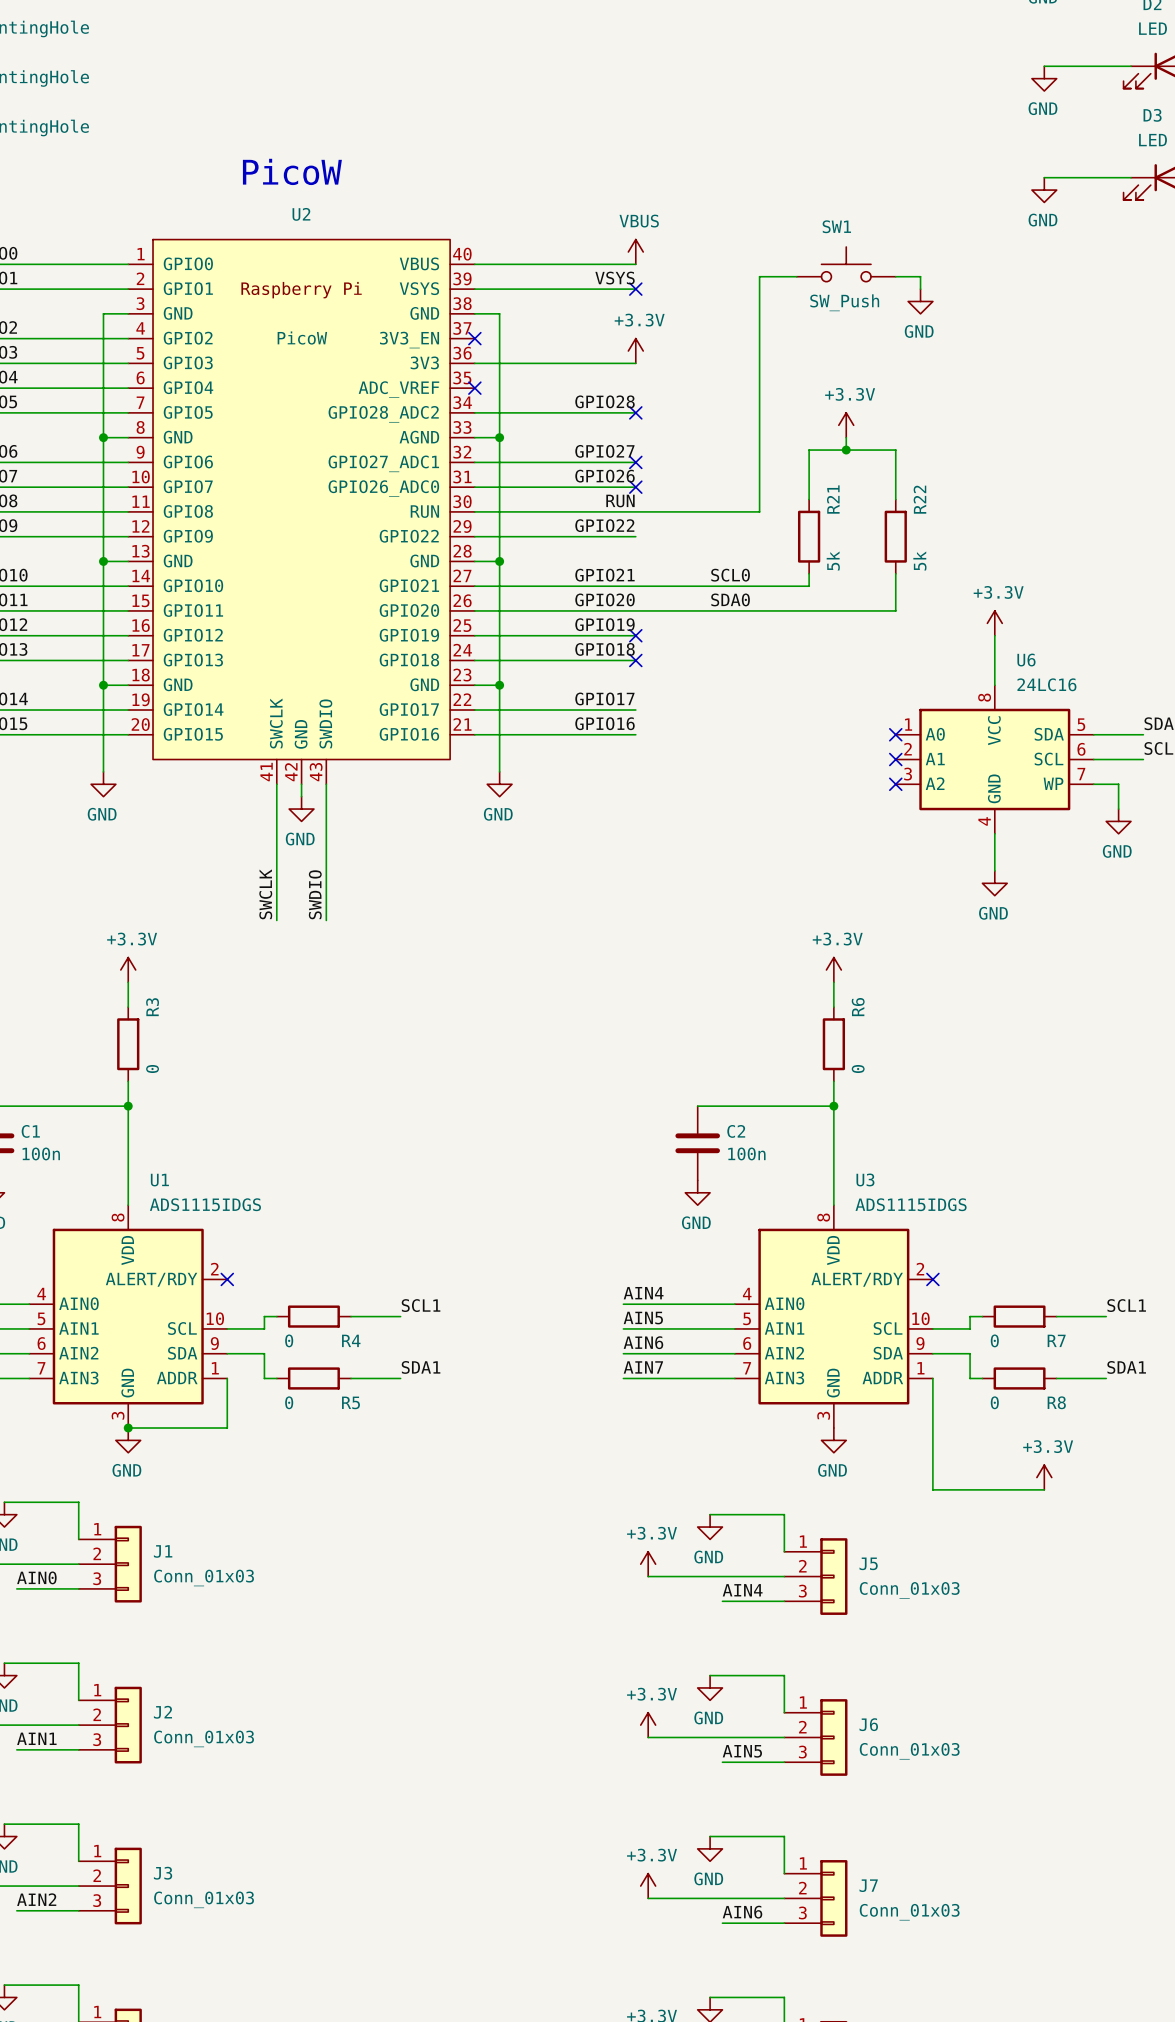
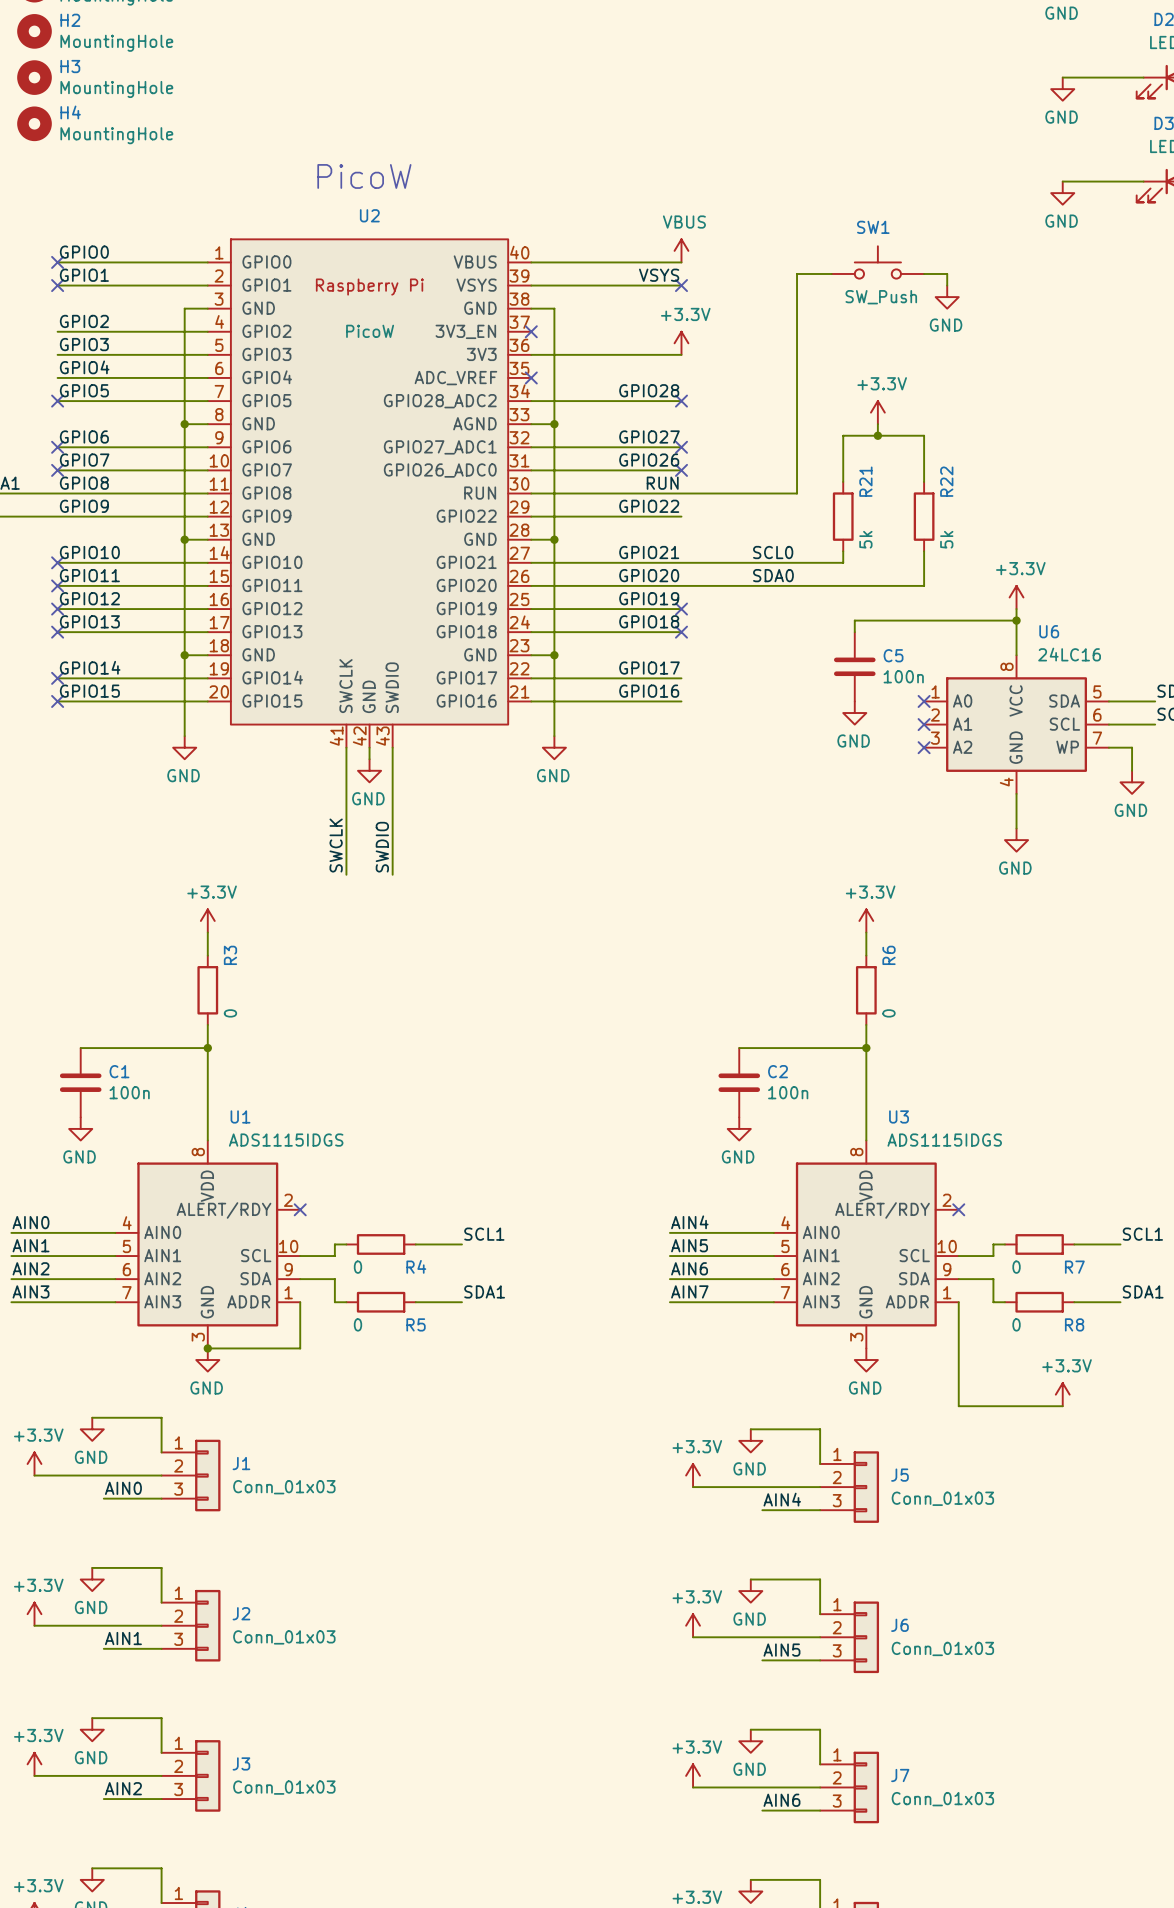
wire: none -> (1016, 620) (854, 620) (854, 632)
junction: none -> (1016, 620)
C5: none -> 100n (854, 666)
power symbol: none -> GND (854, 713)

